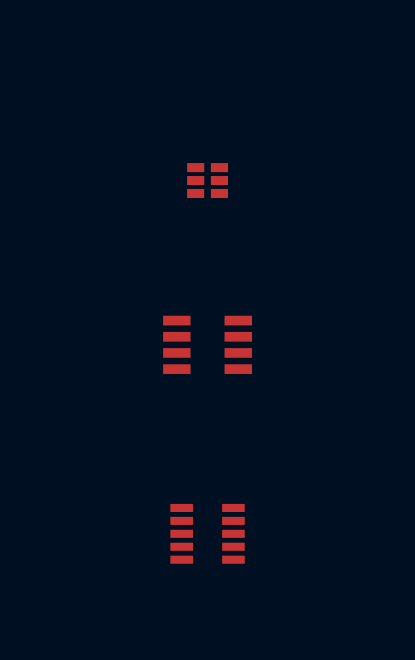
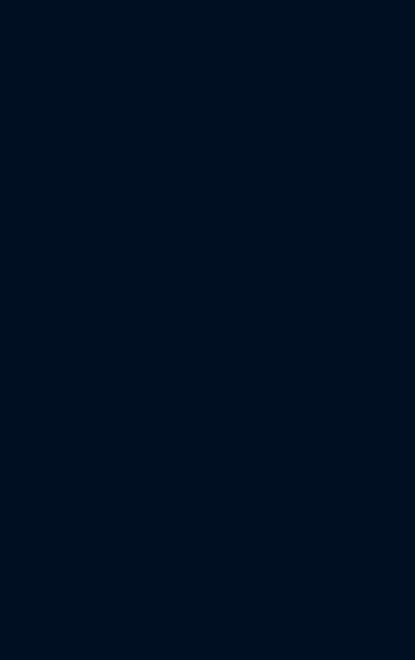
part: (207, 180) -> none
part: (207, 344) -> none
part: (207, 533) -> none

